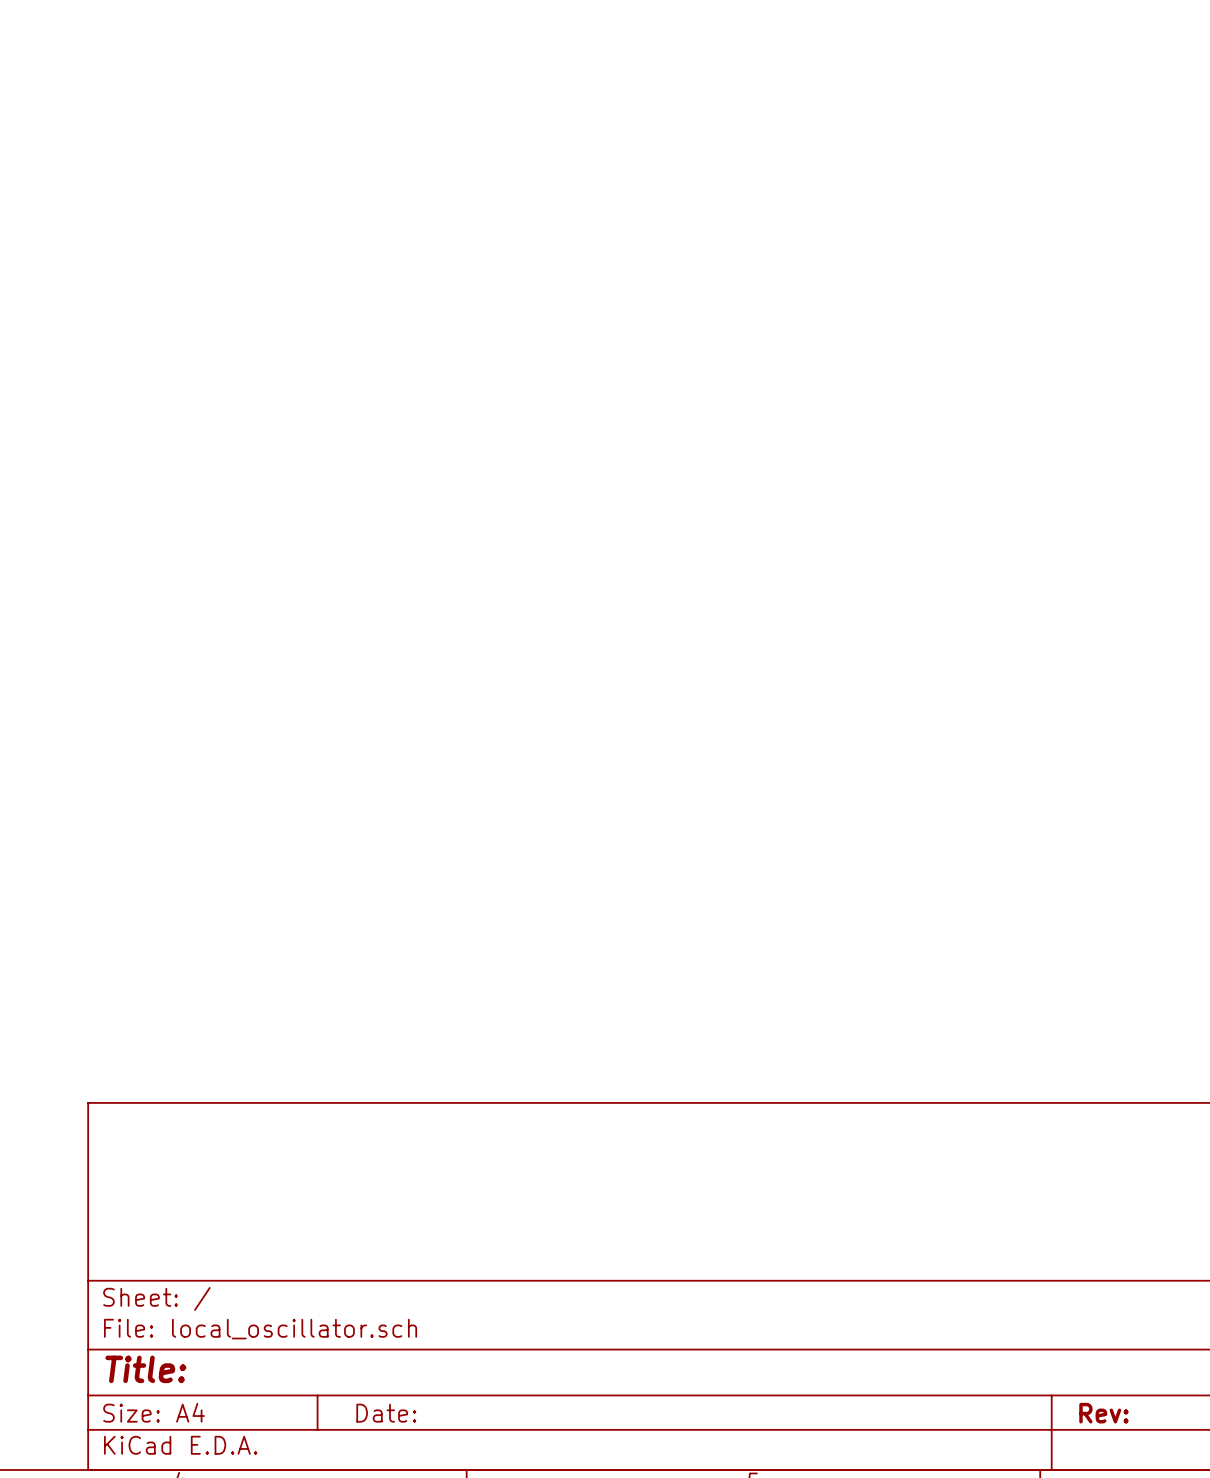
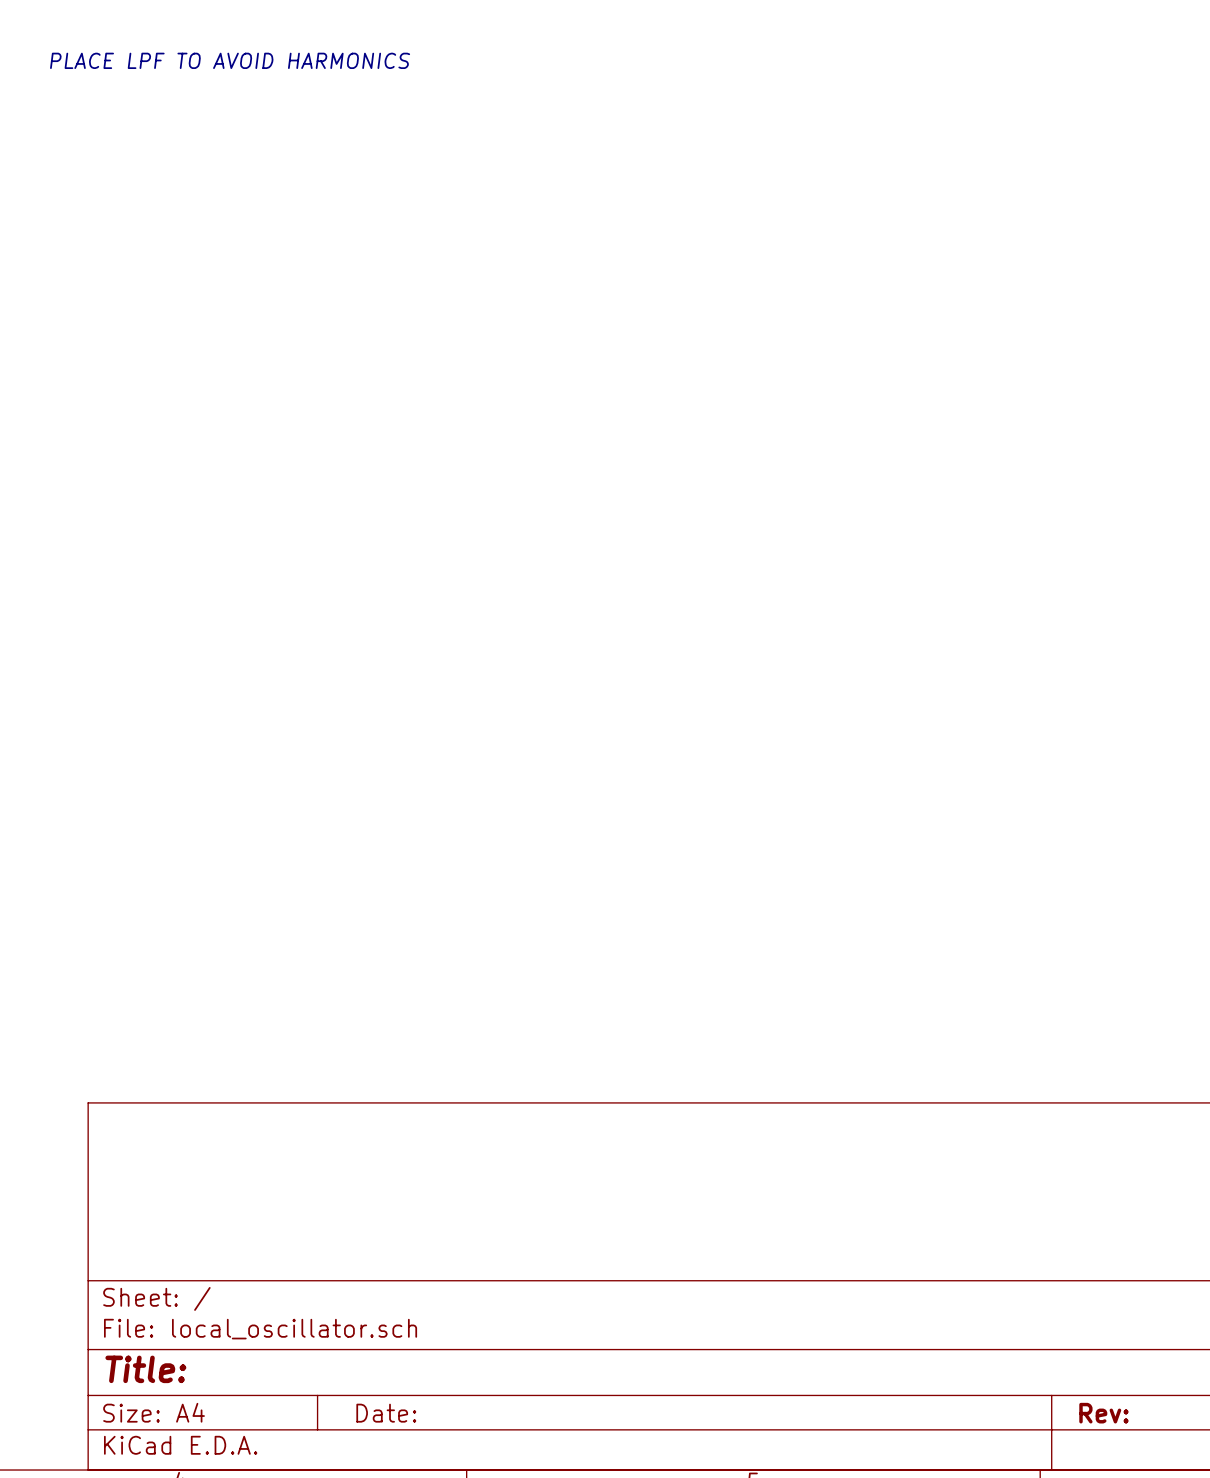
text: none -> PLACE LPF TO AVOID HARMONICS (230, 60)

